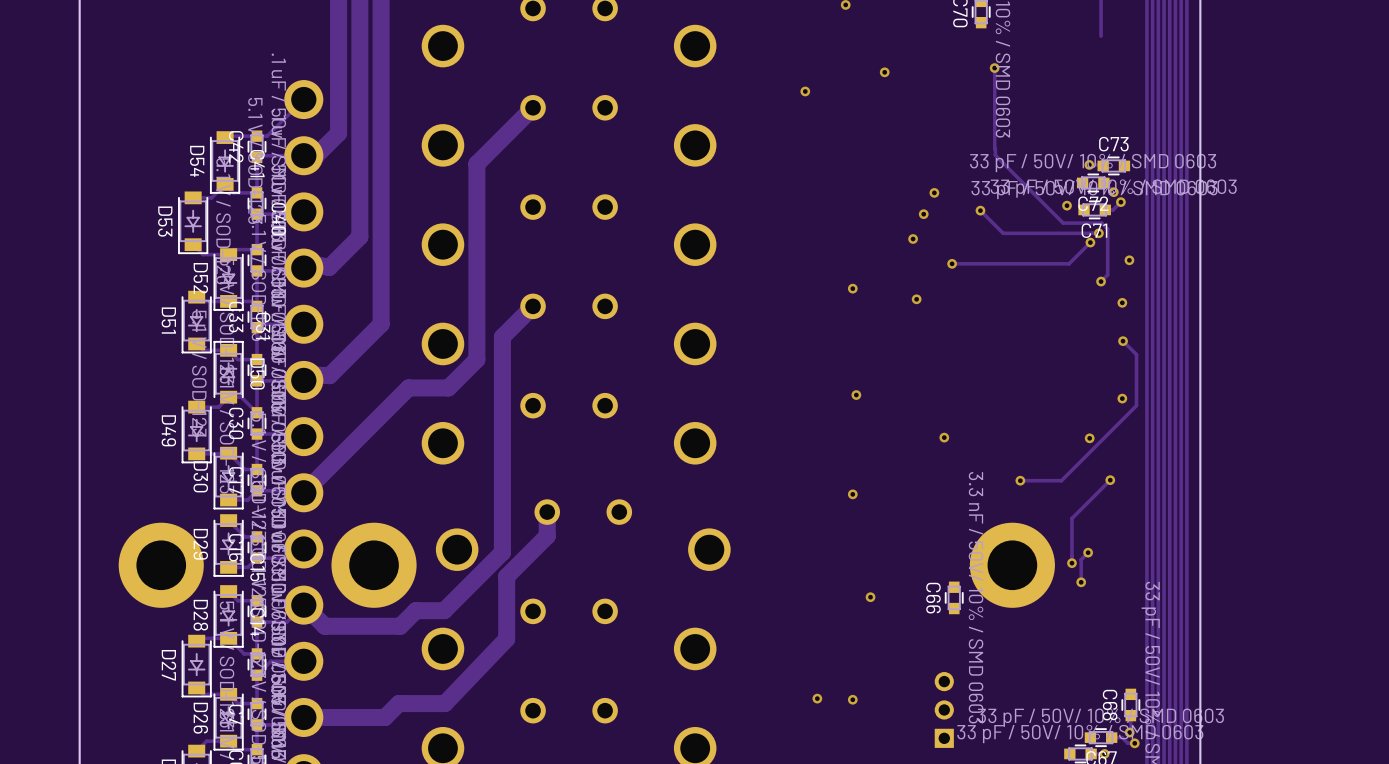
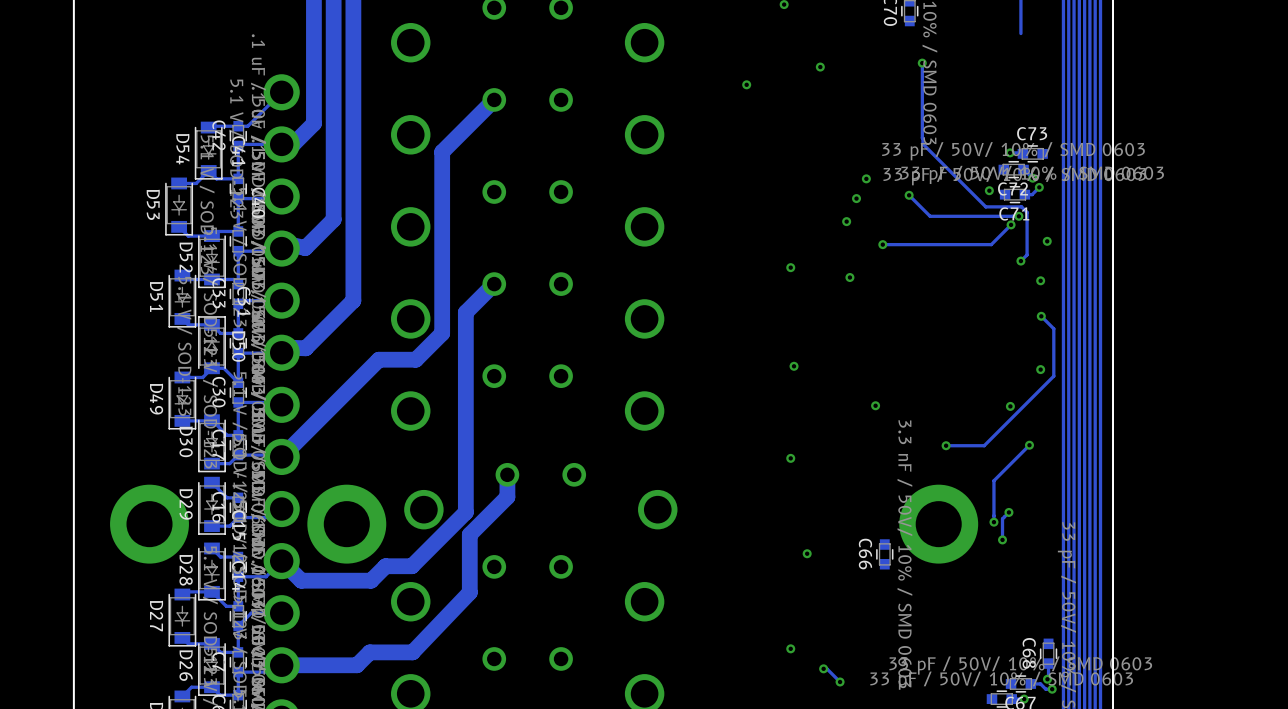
via: (817, 698) -> none
part: (944, 709) -> none
track: none -> (823, 668) (826, 668) (840, 681)
via: none -> (823, 668)
via: none -> (840, 681)

